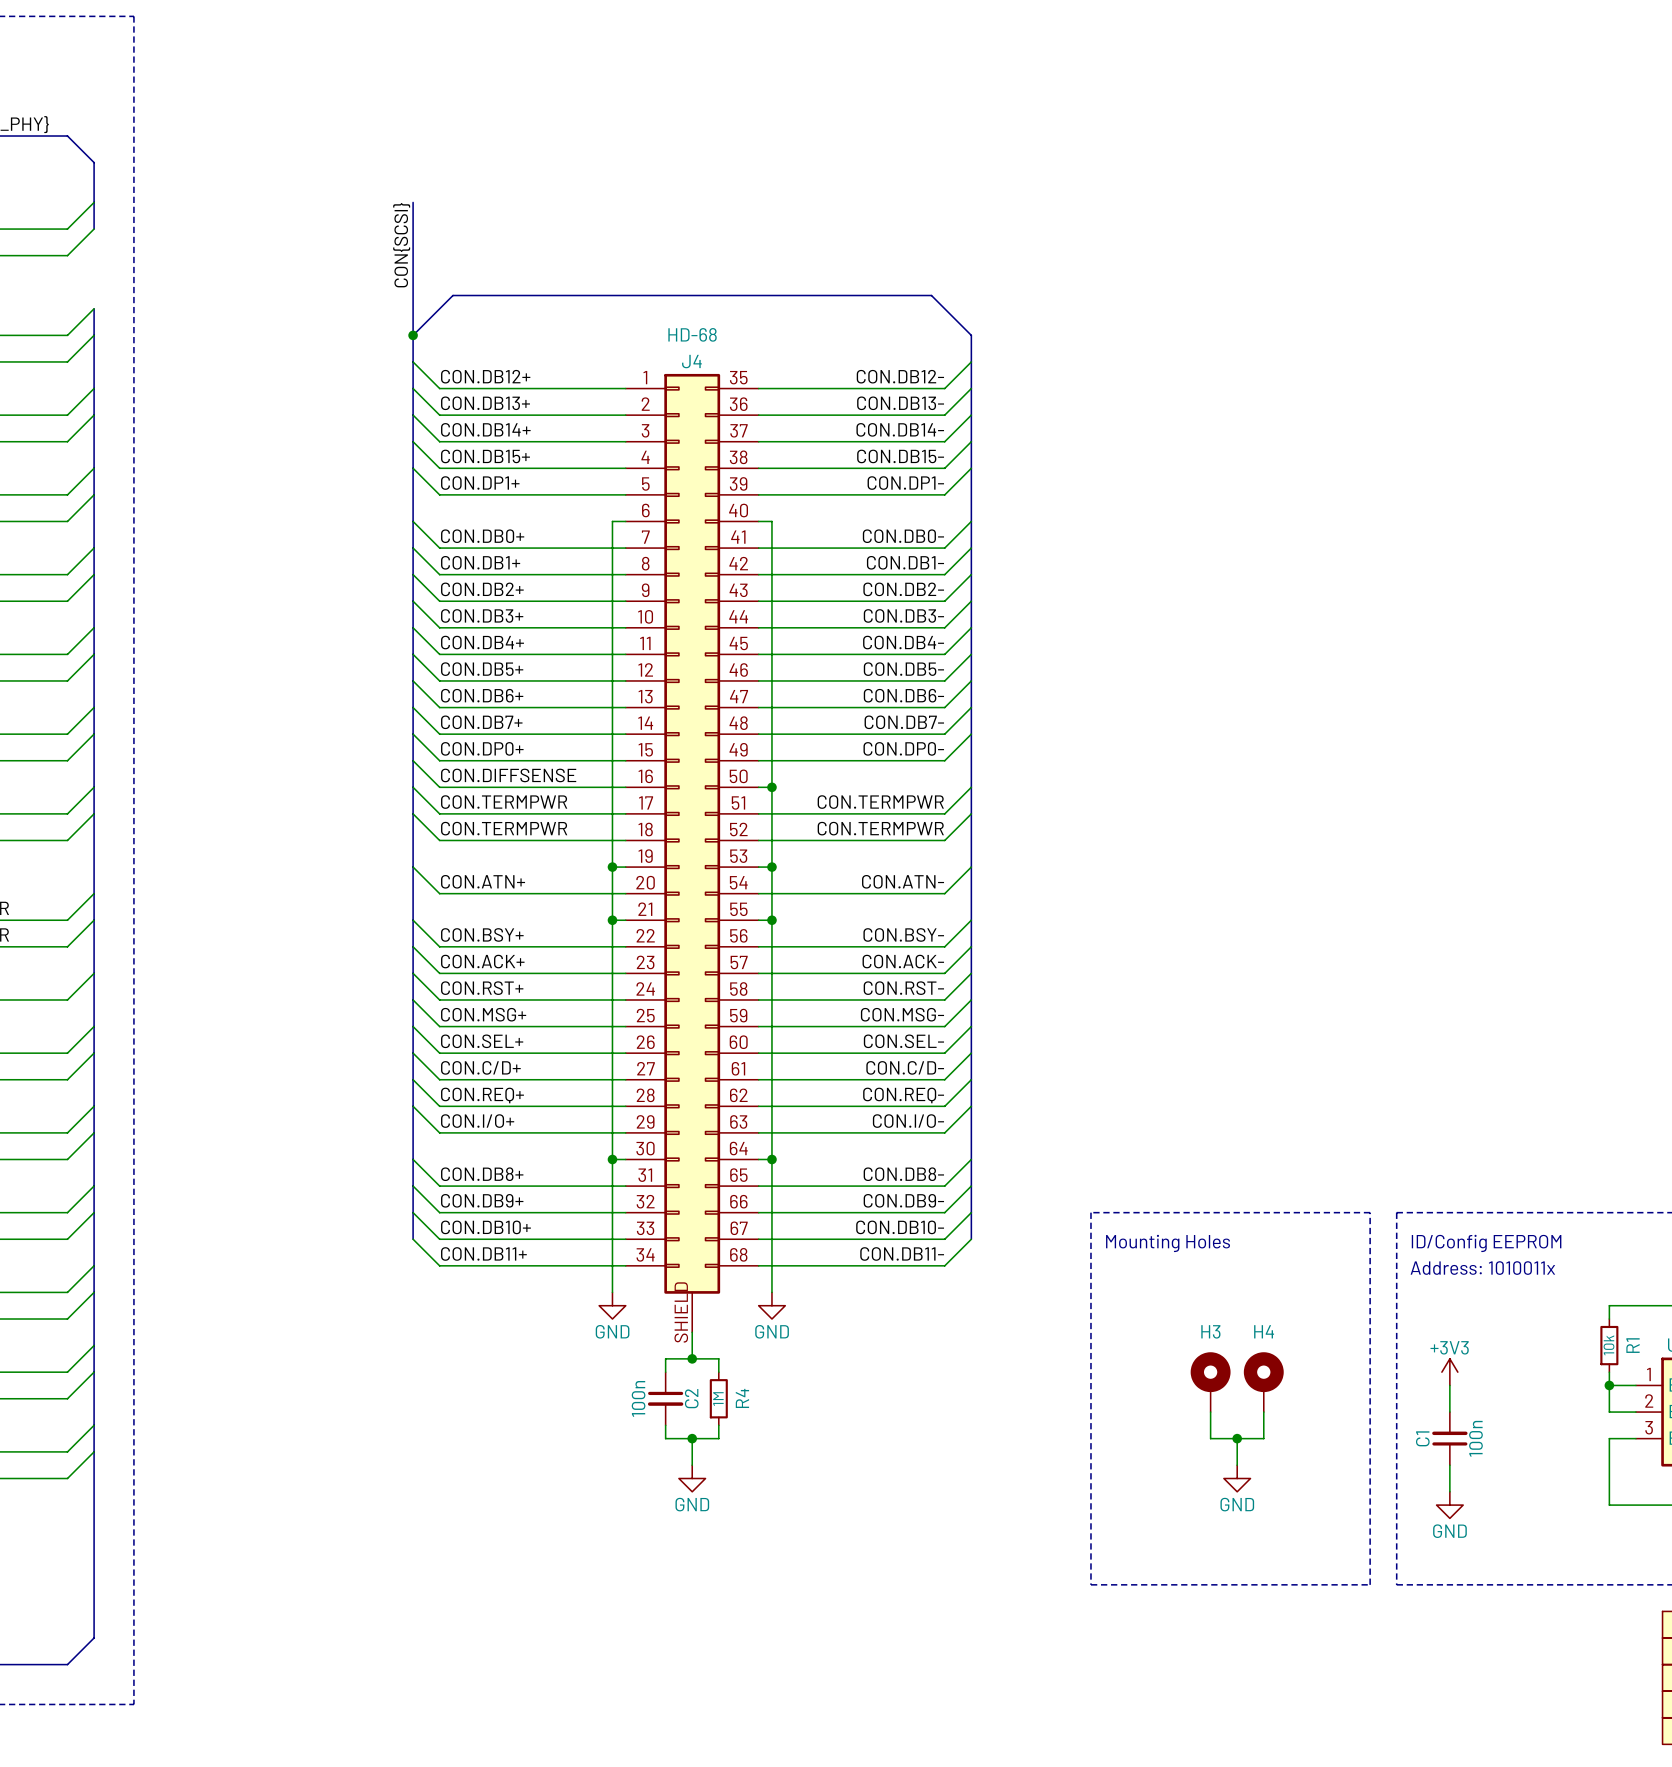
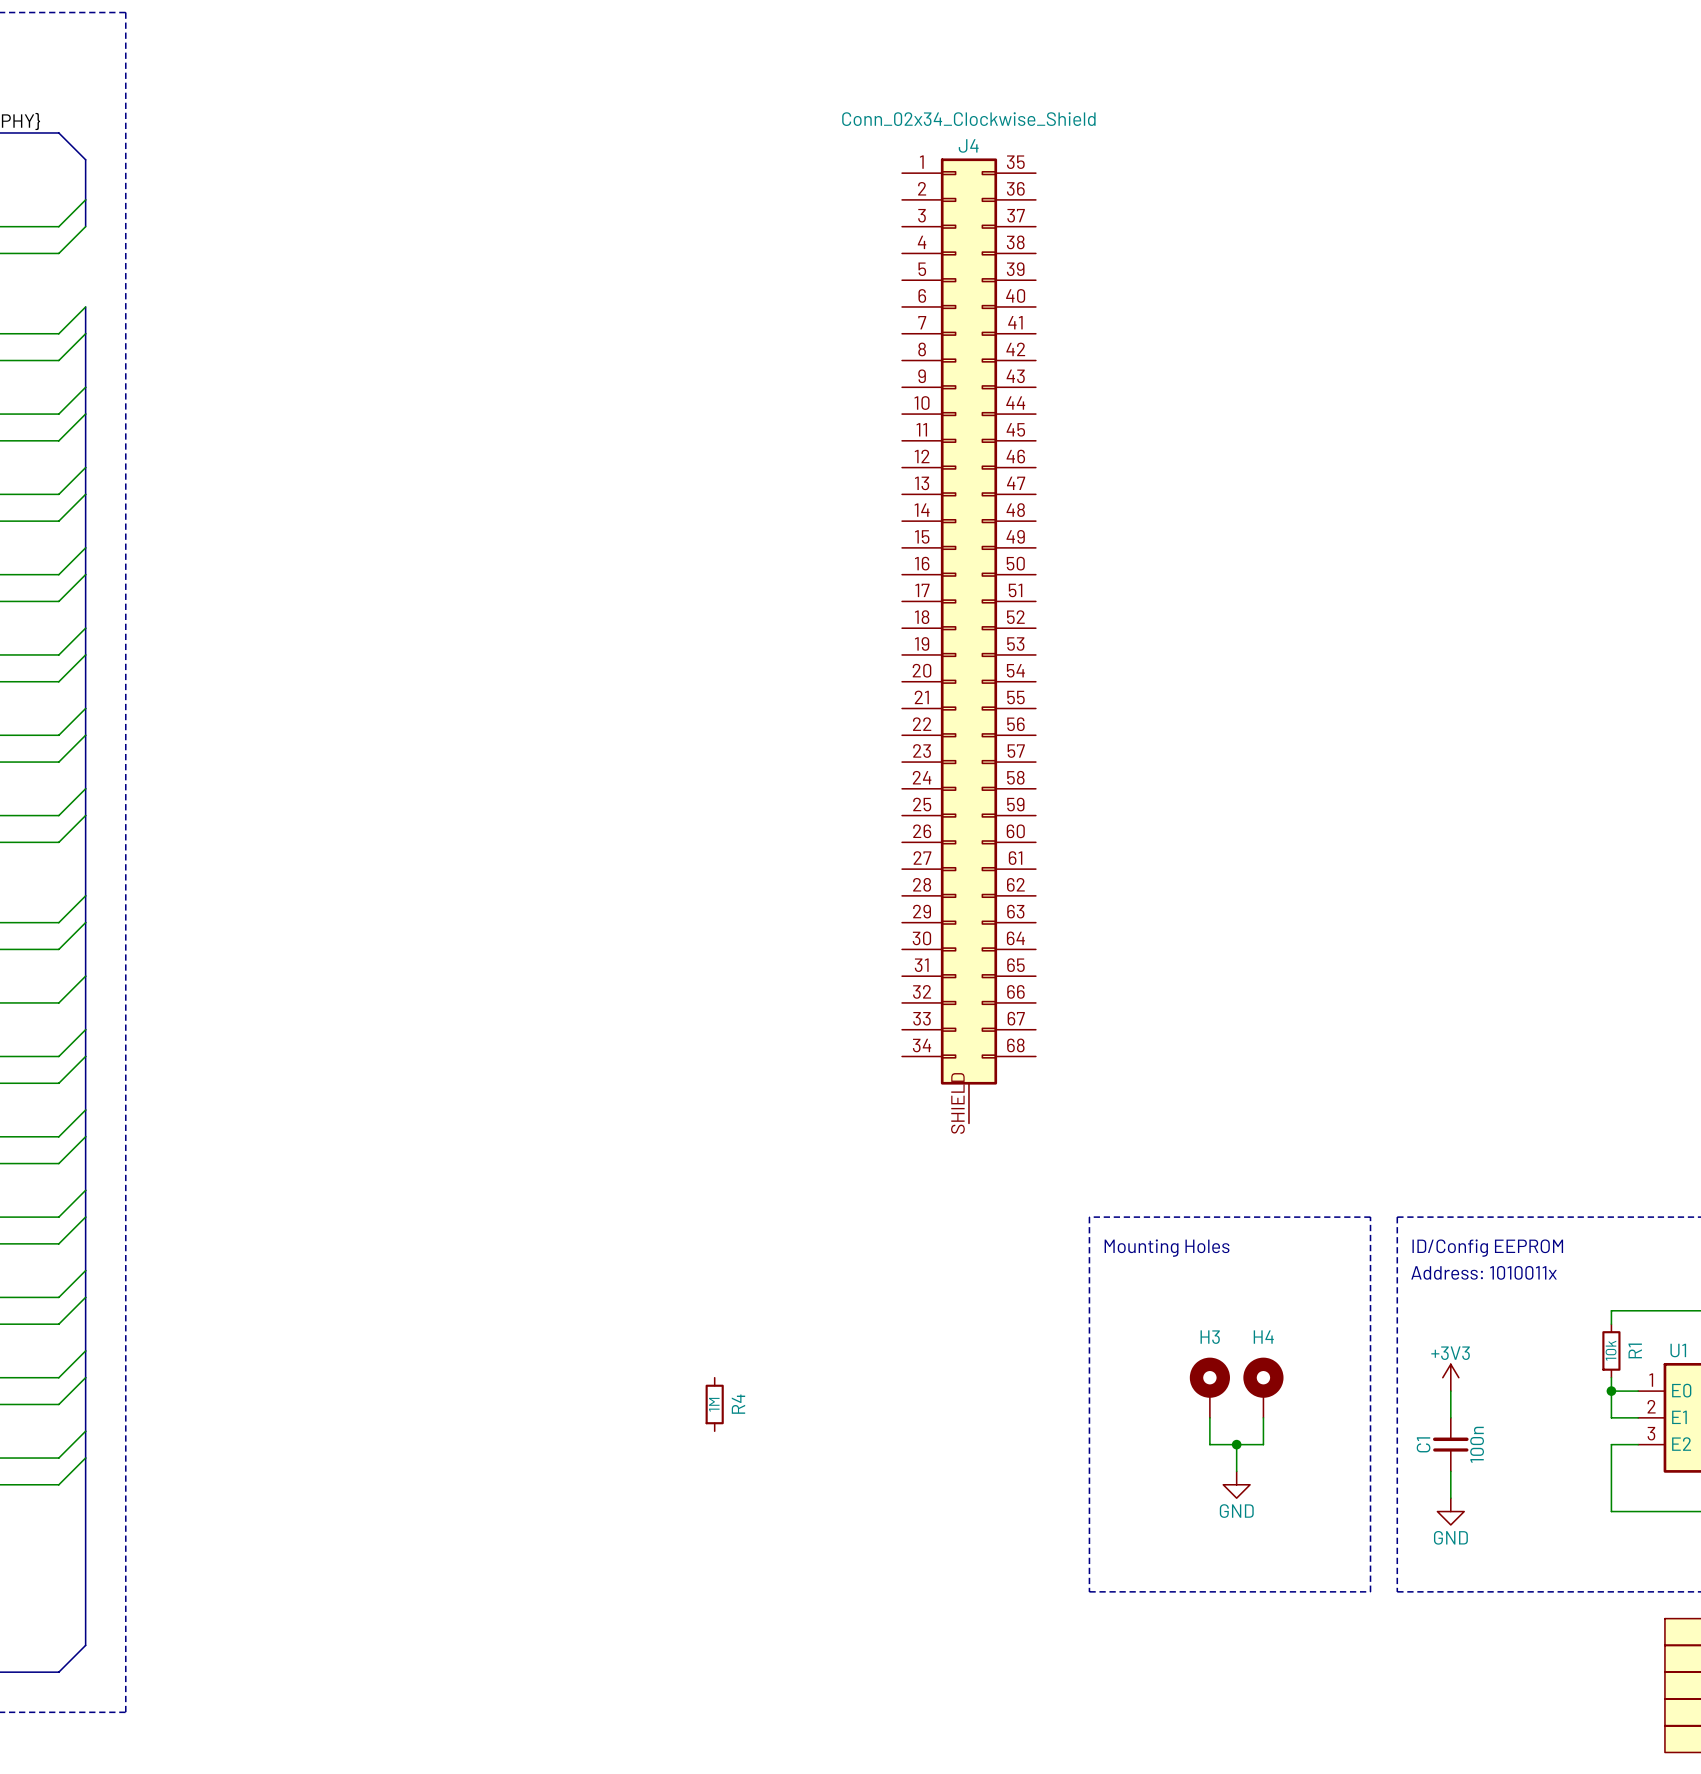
bus: (413, 202) (413, 1239) -> none
label: CON{SCSI} (401, 245) -> none
J4 value: HD-68 (692, 334) -> Conn_02x34_Clockwise_Shield (968, 119)
bus: (413, 335) (452, 295) (931, 295) (971, 335) (971, 1239) -> none
junction: (413, 335) -> none
wire: (413, 361) (439, 388) (625, 388) -> none
wire: (971, 361) (944, 388) (758, 388) -> none
label: CON.DB12+ (485, 376) -> none
label: CON.DB12- (900, 376) -> none
wire: (413, 388) (439, 415) (625, 415) -> none
wire: (971, 388) (944, 415) (758, 415) -> none
label: CON.DB13+ (485, 403) -> none
label: CON.DB13- (900, 403) -> none
wire: (413, 415) (439, 441) (625, 441) -> none
wire: (971, 415) (944, 441) (758, 441) -> none
label: CON.DB14+ (485, 429) -> none
label: CON.DB14- (900, 429) -> none
wire: (413, 441) (439, 468) (625, 468) -> none
wire: (971, 441) (944, 468) (758, 468) -> none
label: CON.DB15+ (485, 456) -> none
label: CON.DB15- (900, 456) -> none
wire: (413, 468) (439, 494) (625, 494) -> none
wire: (971, 468) (944, 494) (758, 494) -> none
label: CON.DP1+ (480, 483) -> none
label: CON.DP1- (905, 483) -> none
wire: (413, 521) (439, 548) (625, 548) -> none
wire: (625, 521) (612, 521) (612, 1292) -> none
wire: (758, 521) (771, 521) (771, 1292) -> none
wire: (971, 521) (944, 548) (758, 548) -> none
label: CON.DB0+ (482, 536) -> none
label: CON.DB0- (903, 536) -> none
wire: (413, 548) (439, 574) (625, 574) -> none
wire: (971, 548) (944, 574) (758, 574) -> none
label: CON.DB1+ (480, 562) -> none
label: CON.DB1- (905, 562) -> none
wire: (413, 574) (439, 601) (625, 601) -> none
wire: (971, 574) (944, 601) (758, 601) -> none
label: CON.DB2+ (482, 589) -> none
label: CON.DB2- (903, 589) -> none
wire: (413, 601) (439, 627) (625, 627) -> none
wire: (971, 601) (944, 627) (758, 627) -> none
label: CON.DB3+ (482, 615) -> none
label: CON.DB3- (903, 615) -> none
wire: (413, 627) (439, 654) (625, 654) -> none
wire: (971, 627) (944, 654) (758, 654) -> none
label: CON.DB4+ (482, 642) -> none
label: CON.DB4- (903, 642) -> none
wire: (413, 654) (439, 680) (625, 680) -> none
wire: (971, 654) (944, 680) (758, 680) -> none
label: CON.DB5+ (482, 669) -> none
label: CON.DB5- (903, 669) -> none
wire: (413, 680) (439, 707) (625, 707) -> none
wire: (971, 680) (944, 707) (758, 707) -> none
label: CON.DB6+ (482, 695) -> none
label: CON.DB6- (903, 695) -> none
wire: (413, 707) (439, 734) (625, 734) -> none
wire: (971, 707) (944, 734) (758, 734) -> none
label: CON.DB7+ (481, 722) -> none
label: CON.DB7- (904, 722) -> none
wire: (413, 734) (439, 760) (625, 760) -> none
wire: (971, 734) (944, 760) (758, 760) -> none
label: CON.DP0+ (482, 748) -> none
label: CON.DP0- (903, 748) -> none
wire: (413, 760) (439, 787) (625, 787) -> none
label: CON.DIFFSENSE (508, 775) -> none
wire: (413, 787) (439, 813) (625, 813) -> none
wire: (758, 787) (771, 787) -> none
junction: (771, 787) -> none
wire: (971, 787) (944, 813) (758, 813) -> none
label: CON.TERMPWR (504, 802) -> none
label: CON.TERMPWR (880, 802) -> none
wire: (413, 813) (439, 840) (625, 840) -> none
wire: (971, 813) (944, 840) (758, 840) -> none
label: CON.TERMPWR (504, 828) -> none
label: CON.TERMPWR (880, 828) -> none
J4 position: (692, 853) -> (968, 640)
wire: (413, 867) (439, 893) (625, 893) -> none
wire: (612, 867) (625, 867) -> none
junction: (612, 867) -> none
wire: (758, 867) (771, 867) -> none
junction: (771, 867) -> none
wire: (971, 867) (944, 893) (758, 893) -> none
label: CON.ATN+ (483, 881) -> none
label: CON.ATN- (903, 881) -> none
wire: (413, 920) (439, 946) (625, 946) -> none
wire: (612, 920) (625, 920) -> none
junction: (612, 920) -> none
wire: (758, 920) (771, 920) -> none
junction: (771, 920) -> none
wire: (971, 920) (944, 946) (758, 946) -> none
label: CON.BSY+ (482, 934) -> none
label: CON.BSY- (903, 934) -> none
wire: (413, 946) (439, 973) (625, 973) -> none
wire: (971, 946) (944, 973) (758, 973) -> none
label: CON.ACK+ (482, 961) -> none
label: CON.ACK- (903, 961) -> none
wire: (413, 973) (439, 999) (625, 999) -> none
wire: (971, 973) (944, 999) (758, 999) -> none
label: CON.RST+ (482, 988) -> none
label: CON.RST- (903, 988) -> none
wire: (413, 999) (439, 1026) (625, 1026) -> none
wire: (971, 999) (944, 1026) (758, 1026) -> none
label: CON.MSG+ (483, 1014) -> none
label: CON.MSG- (902, 1014) -> none
wire: (413, 1026) (439, 1053) (625, 1053) -> none
wire: (971, 1026) (944, 1053) (758, 1053) -> none
label: CON.SEL+ (482, 1041) -> none
label: CON.SEL- (903, 1041) -> none
wire: (413, 1053) (439, 1079) (625, 1079) -> none
wire: (971, 1053) (944, 1079) (758, 1079) -> none
label: CON.C/D+ (480, 1067) -> none
label: CON.C/D- (905, 1067) -> none
wire: (413, 1079) (439, 1106) (625, 1106) -> none
wire: (971, 1079) (944, 1106) (758, 1106) -> none
label: CON.REQ+ (482, 1095) -> none
label: CON.REQ- (903, 1095) -> none
wire: (413, 1106) (439, 1132) (625, 1132) -> none
wire: (971, 1106) (944, 1132) (758, 1132) -> none
label: CON.I/O+ (477, 1121) -> none
label: CON.I/O- (908, 1121) -> none
wire: (413, 1159) (439, 1186) (625, 1186) -> none
wire: (612, 1159) (625, 1159) -> none
junction: (612, 1159) -> none
wire: (758, 1159) (771, 1159) -> none
junction: (771, 1159) -> none
wire: (971, 1159) (944, 1186) (758, 1186) -> none
label: CON.DB8+ (482, 1174) -> none
label: CON.DB8- (903, 1174) -> none
wire: (413, 1186) (439, 1212) (625, 1212) -> none
wire: (971, 1186) (944, 1212) (758, 1212) -> none
label: CON.DB9+ (482, 1200) -> none
label: CON.DB9- (903, 1200) -> none
wire: (413, 1212) (439, 1239) (625, 1239) -> none
wire: (971, 1212) (944, 1239) (758, 1239) -> none
label: CON.DB10+ (485, 1227) -> none
label: CON.DB10- (900, 1227) -> none
wire: (413, 1239) (439, 1265) (625, 1265) -> none
wire: (971, 1239) (944, 1265) (758, 1265) -> none
label: CON.DB11+ (483, 1253) -> none
label: CON.DB11- (902, 1253) -> none
power symbol: GND (612, 1305) -> none
power symbol: GND (771, 1305) -> none
wire: (692, 1332) (692, 1358) -> none
junction: (692, 1358) -> none
wire: (665, 1372) (665, 1358) (718, 1358) (718, 1372) -> none
C2: 100n (665, 1398) -> none
wire: (665, 1425) (665, 1438) (718, 1438) (718, 1425) -> none
wire: (692, 1438) (692, 1465) -> none
junction: (692, 1438) -> none
power symbol: GND (692, 1478) -> none

